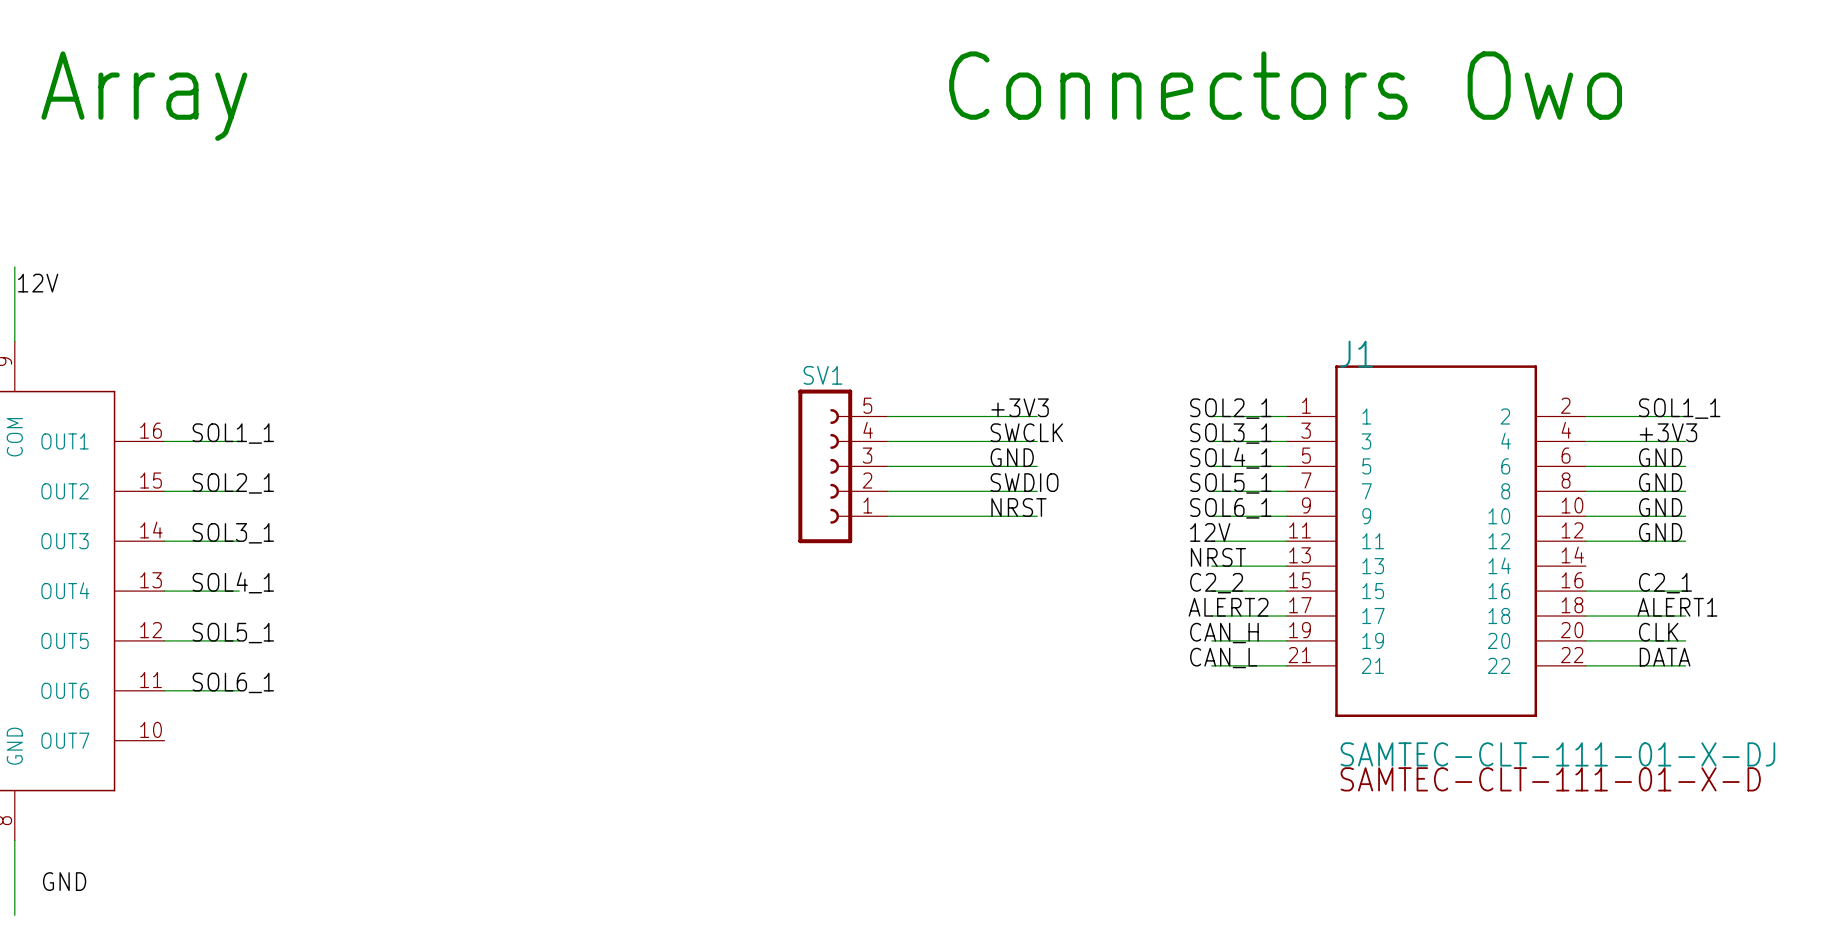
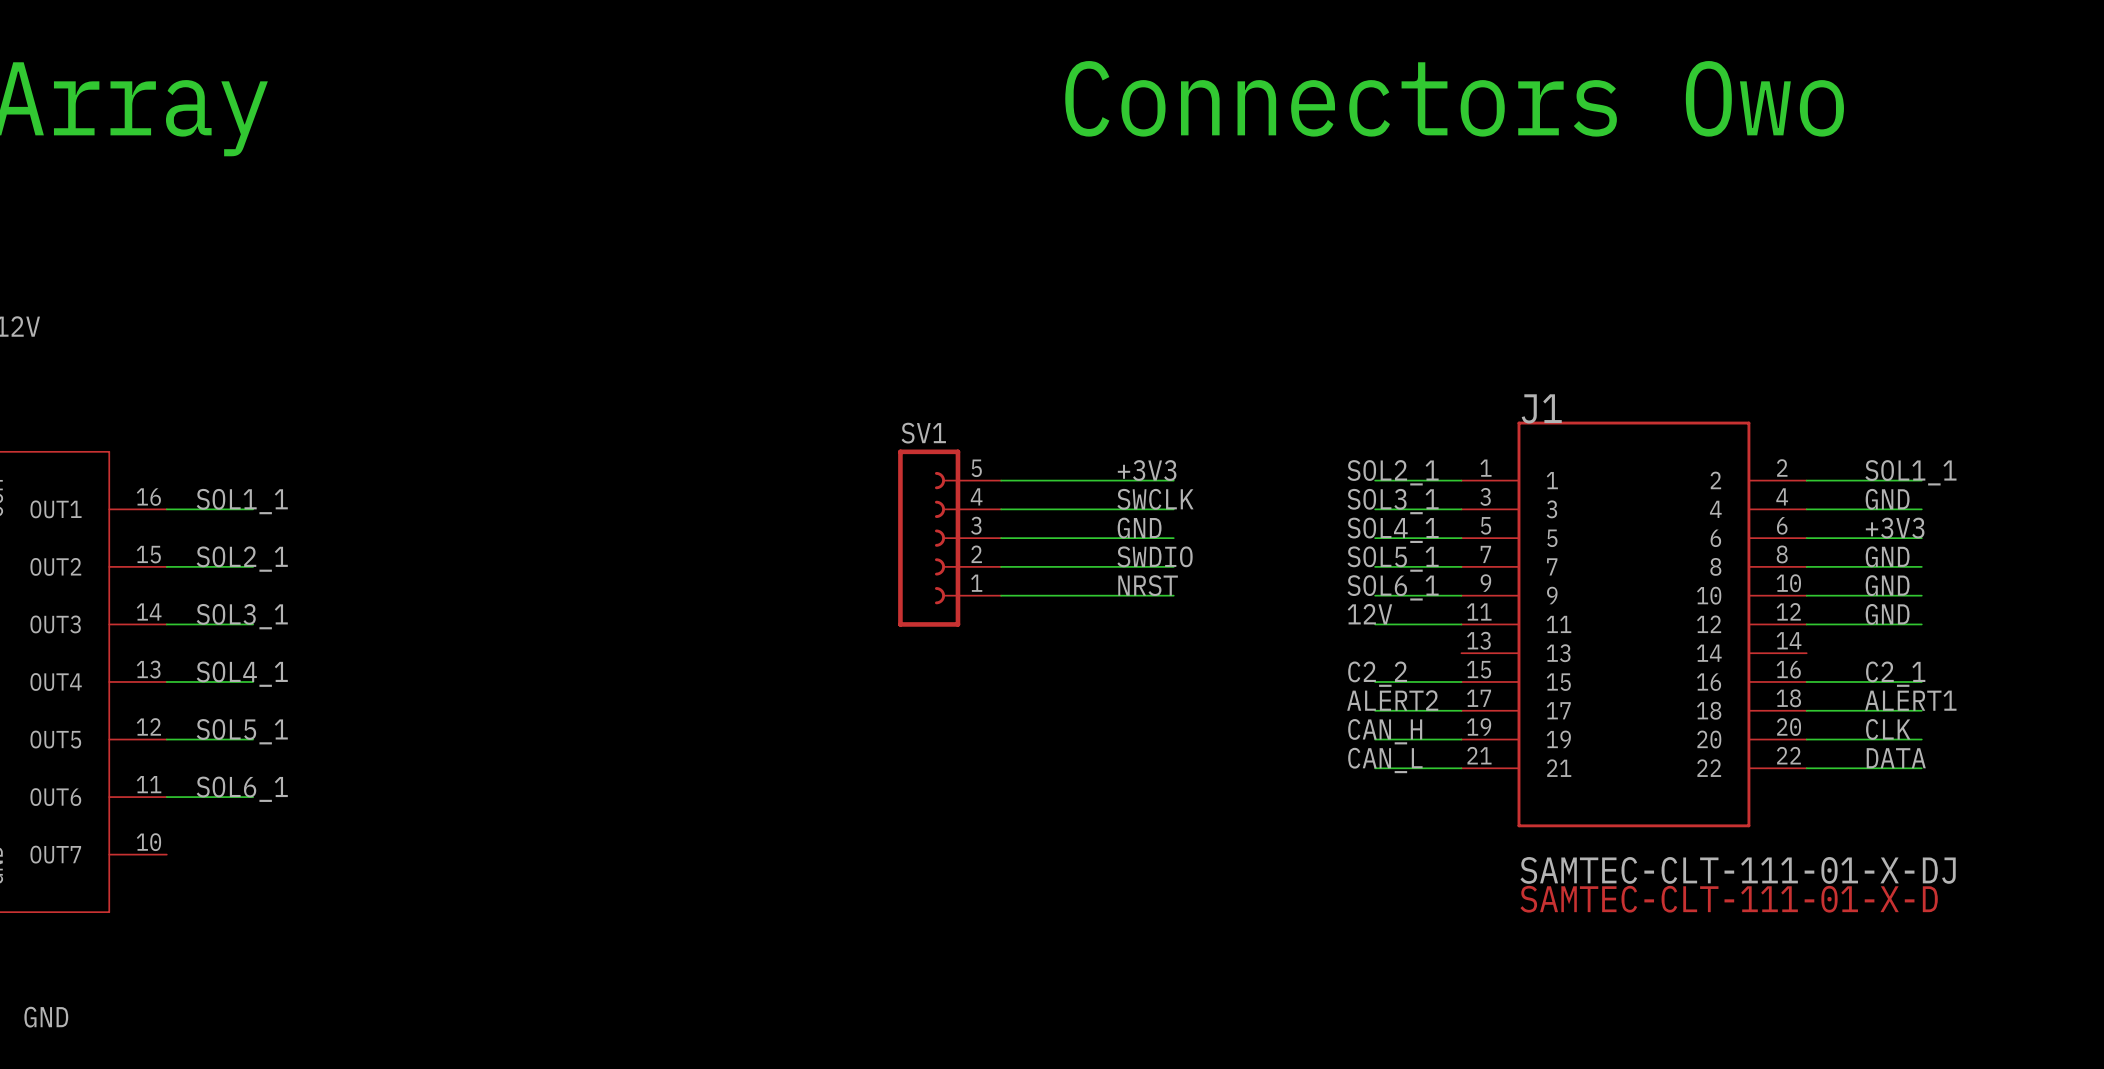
label: +3V3 (1668, 432) -> GND (1887, 499)
label: GND (1660, 457) -> +3V3 (1895, 528)
label: NRST (1218, 557) -> none
wire: (1211, 566) (1286, 566) -> none

